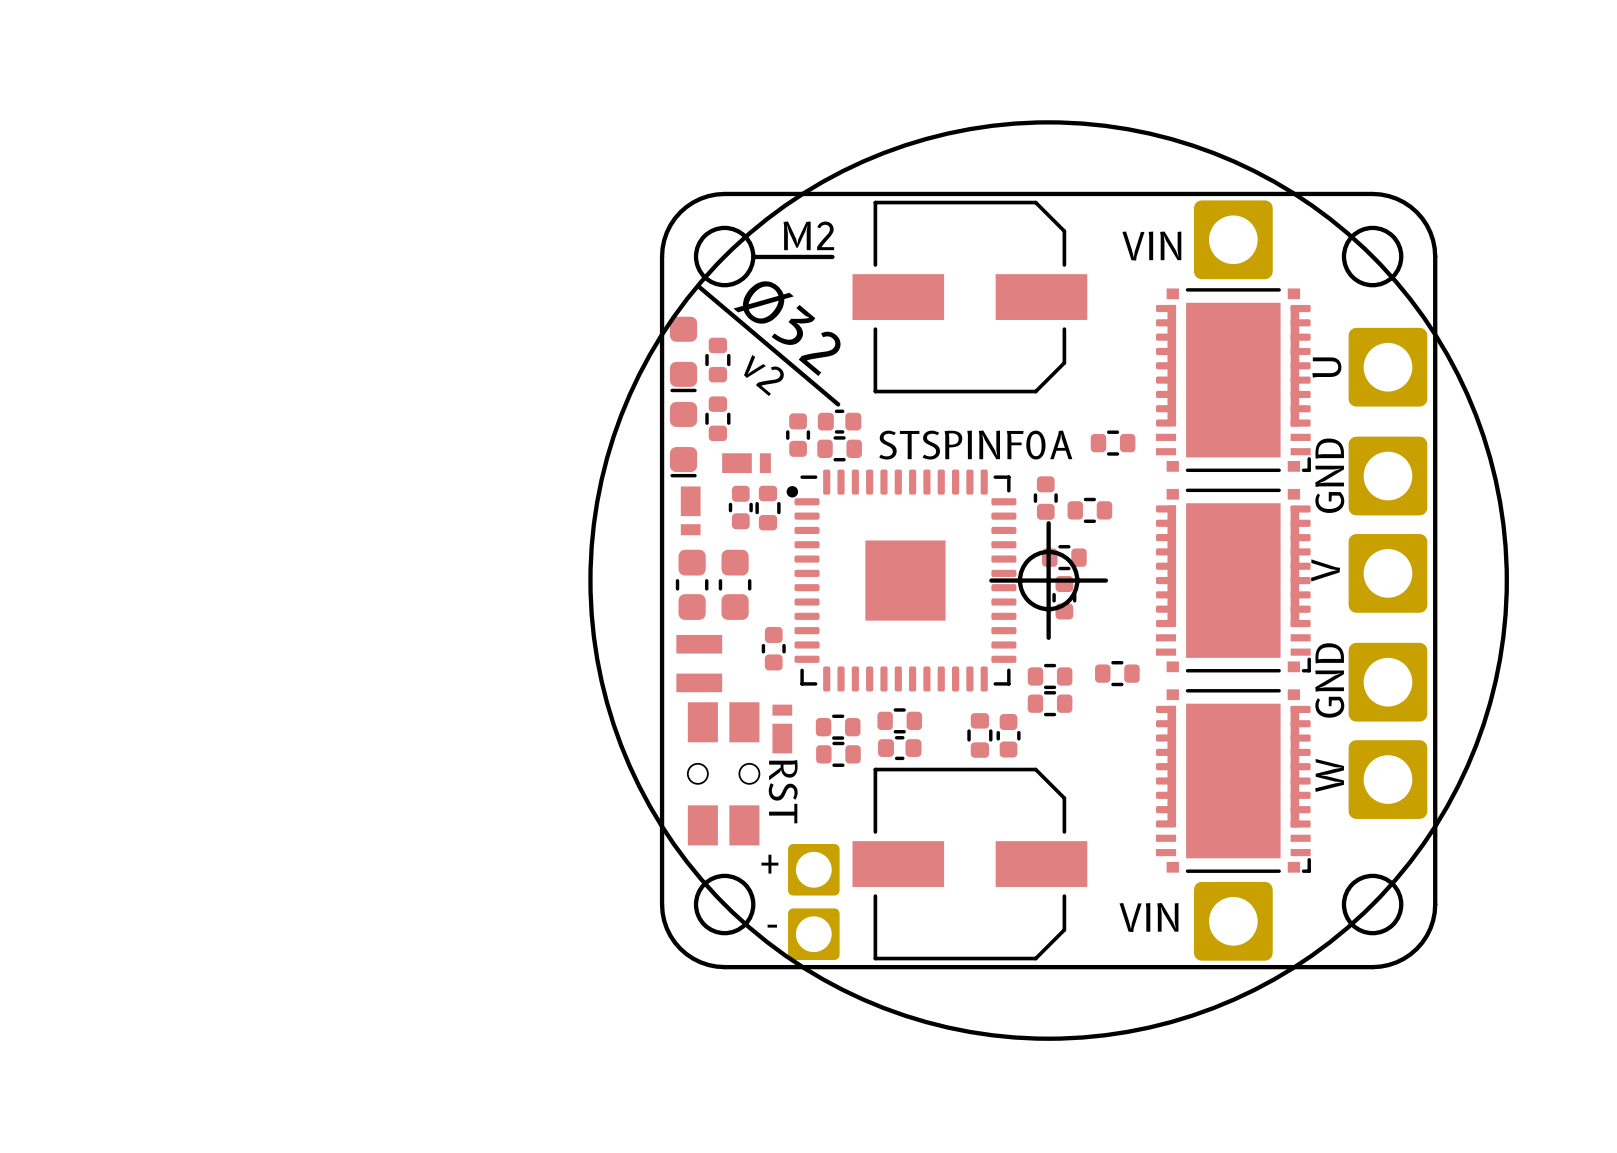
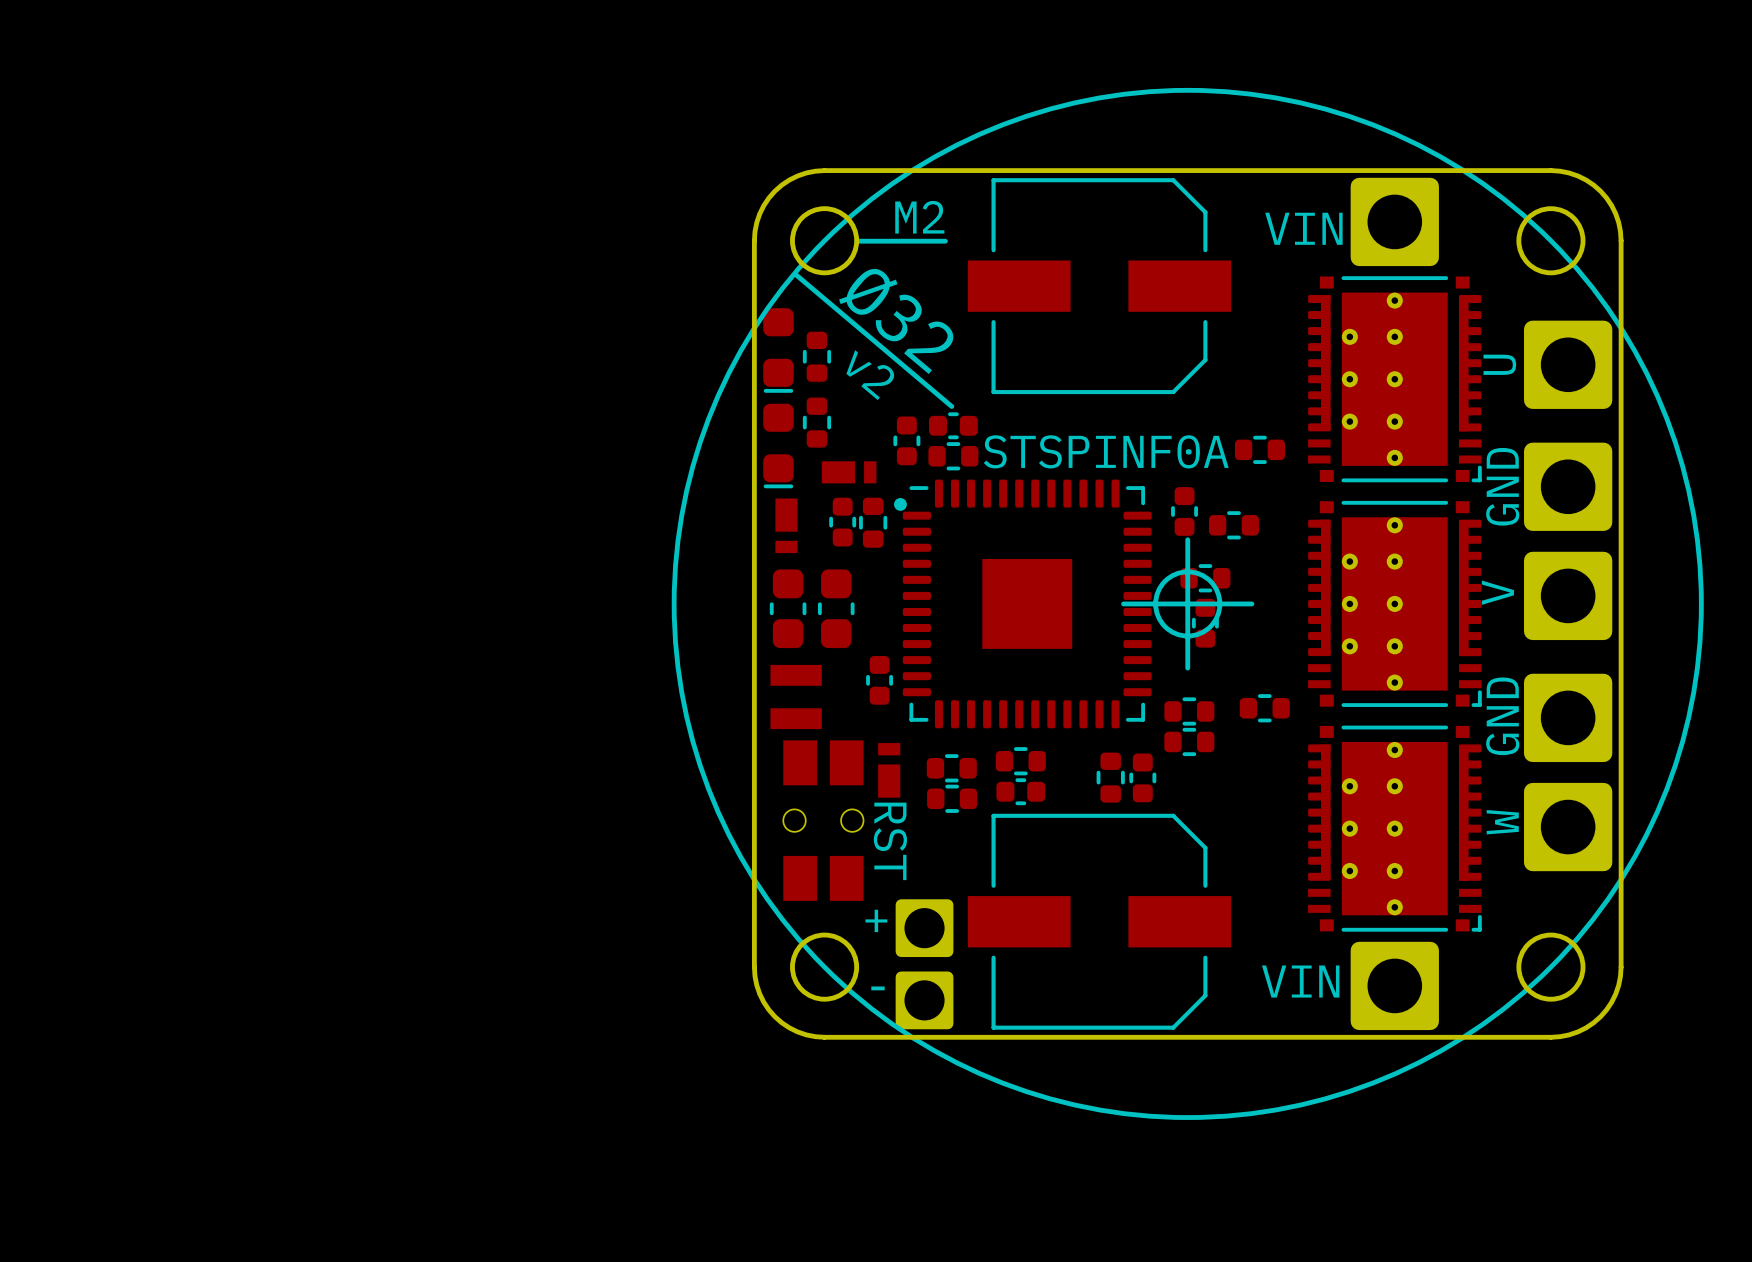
part footprint: [1156, 288, 1311, 473] -> [1308, 276, 1482, 483]
part footprint: [1156, 488, 1311, 673] -> [1308, 500, 1482, 707]
part footprint: [1156, 689, 1311, 873] -> [1308, 725, 1482, 932]

